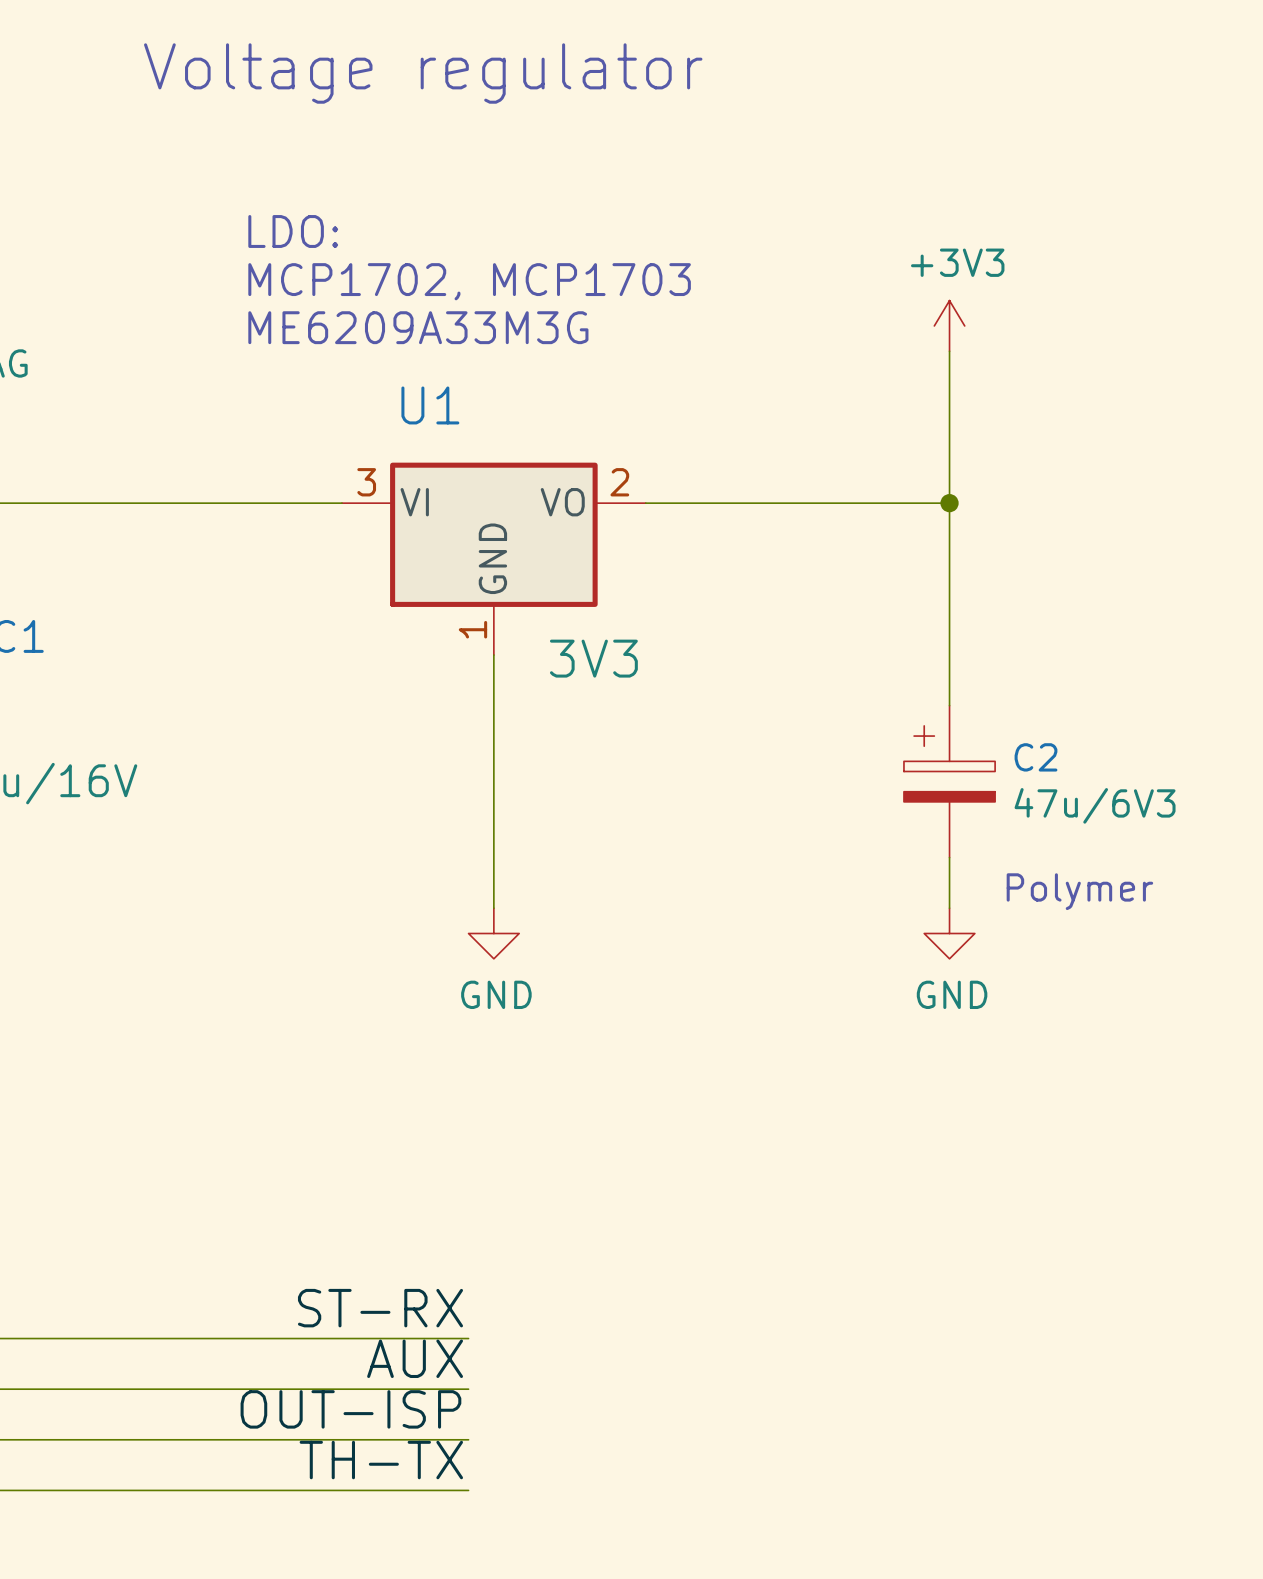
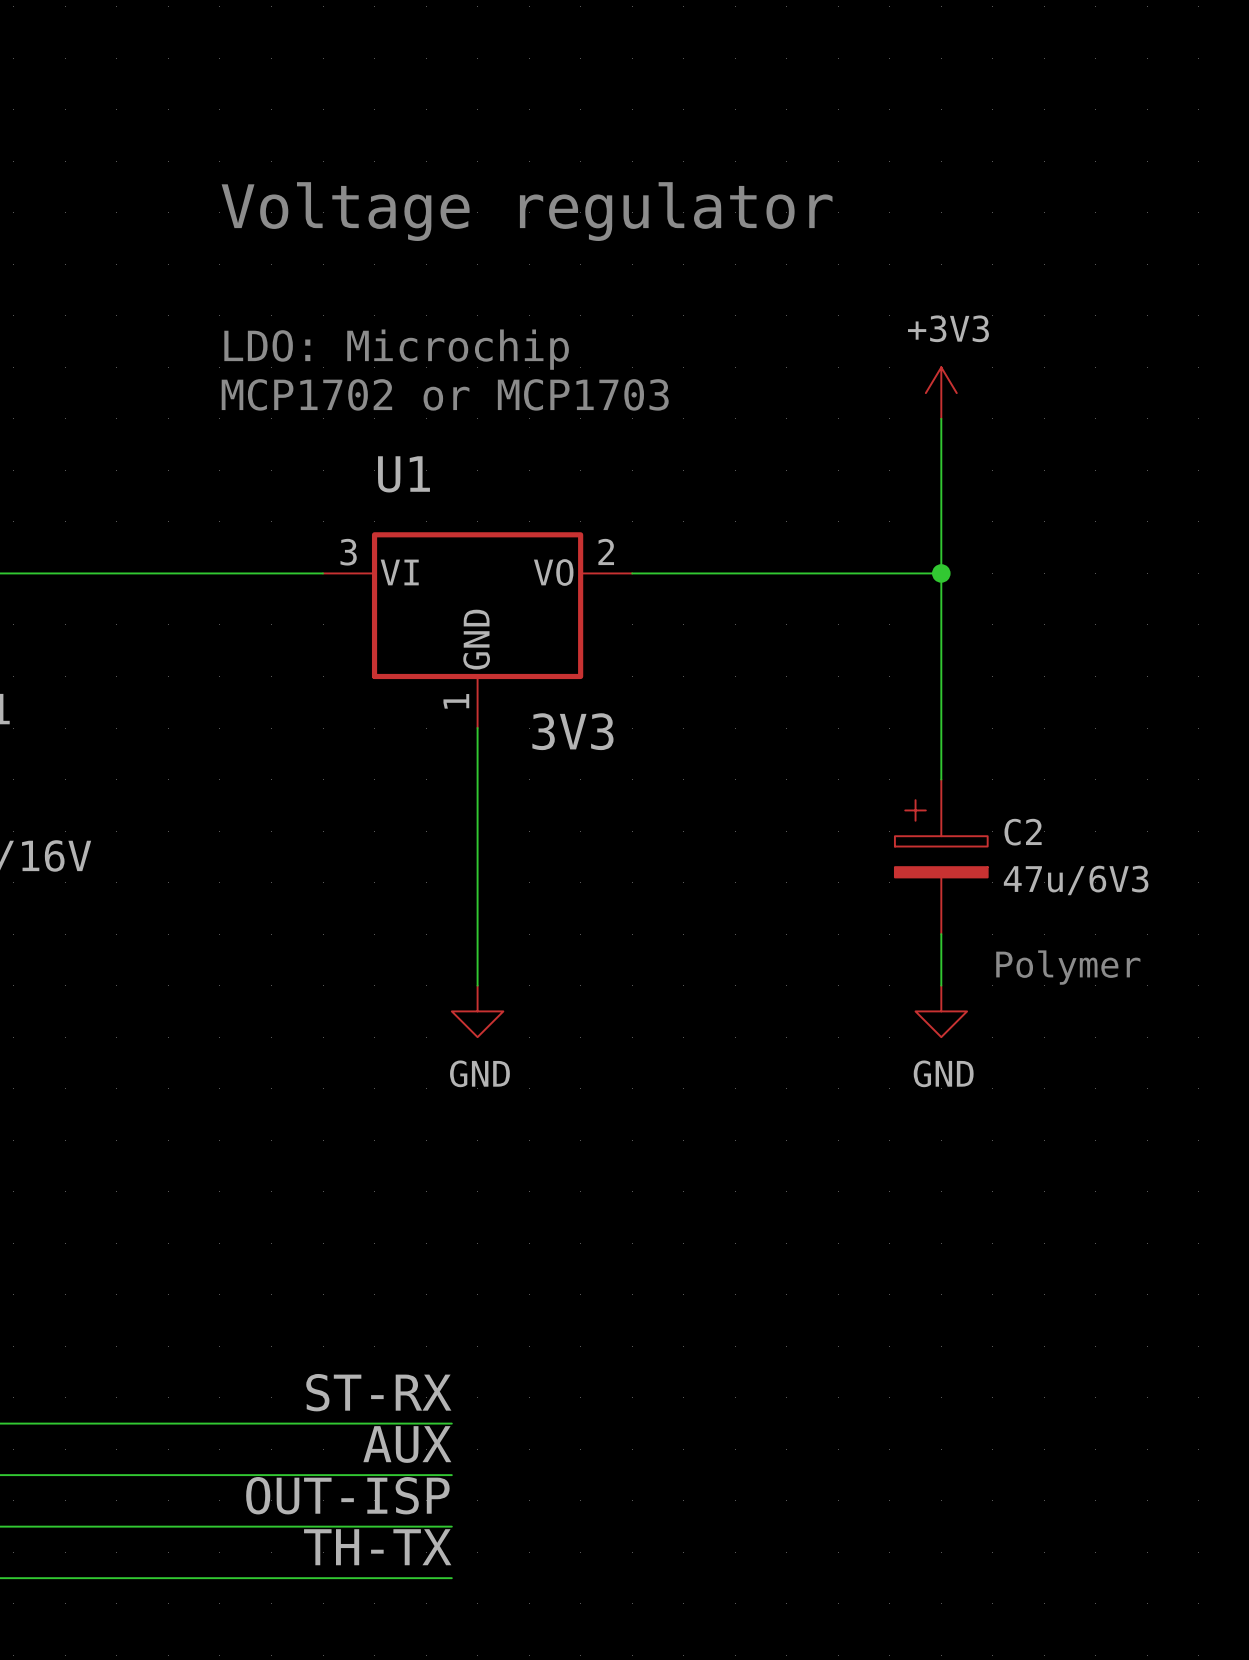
text position: Voltage regulator (423, 73) -> Voltage regulator (527, 211)
text: LDO: (293, 231) -> none
text: MCP1702, MCP1703 (469, 281) -> LDO: Microchip (396, 349)
text: ME6209A33M3G (418, 327) -> MCP1702 or MCP1703 (445, 394)

